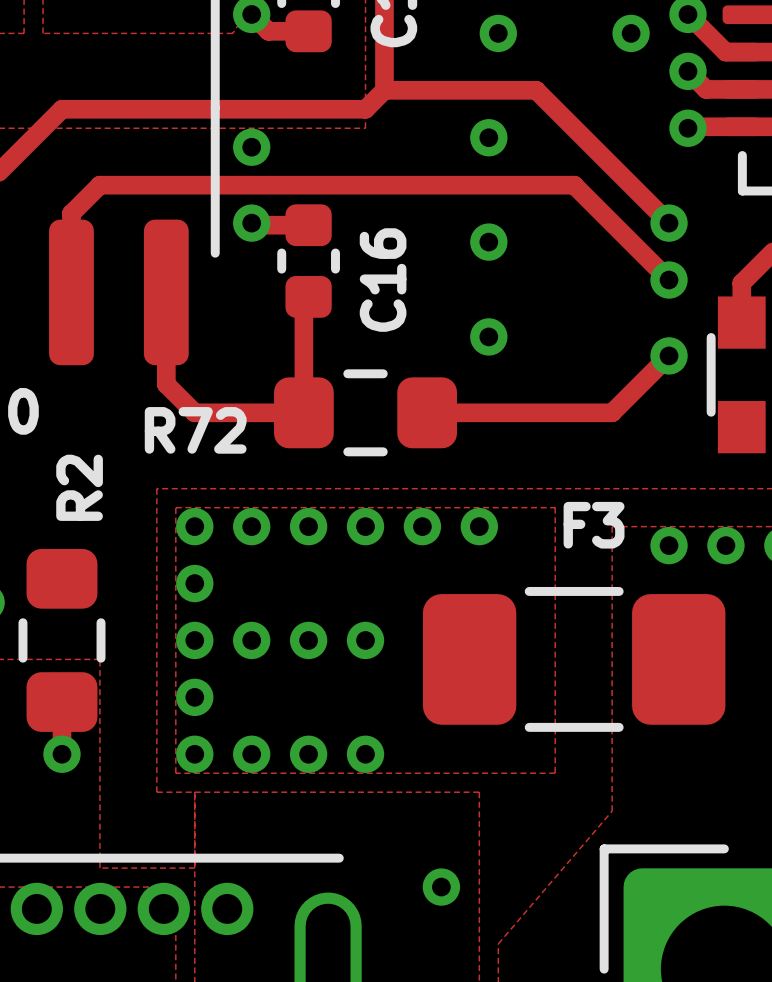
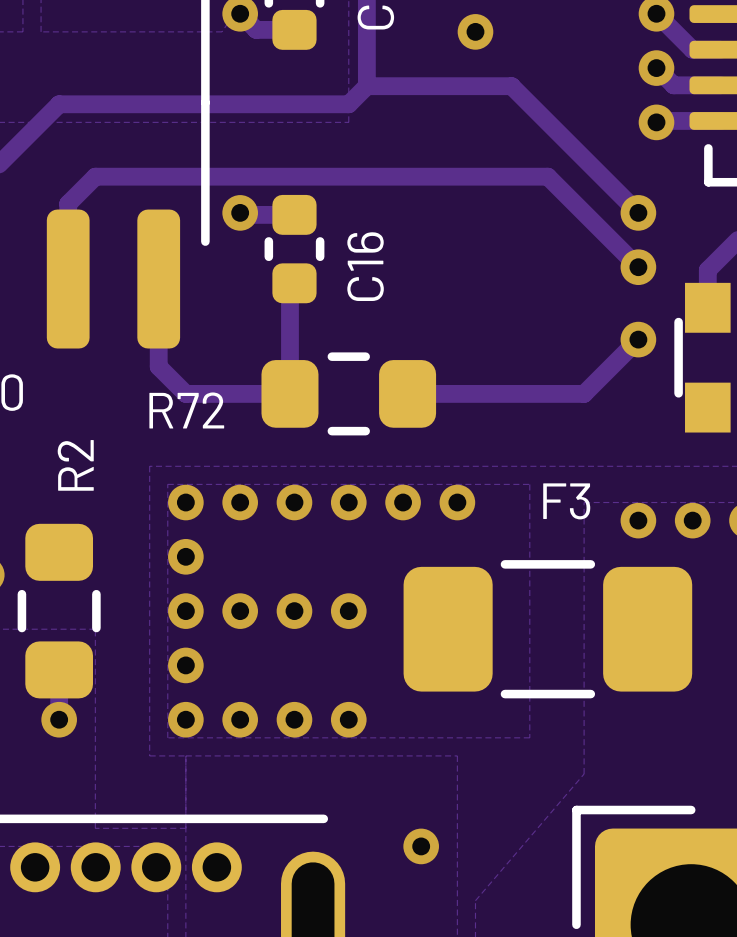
via: (631, 33) -> none
via: (488, 137) -> none
via: (251, 147) -> none
via: (488, 242) -> none
via: (488, 336) -> none

